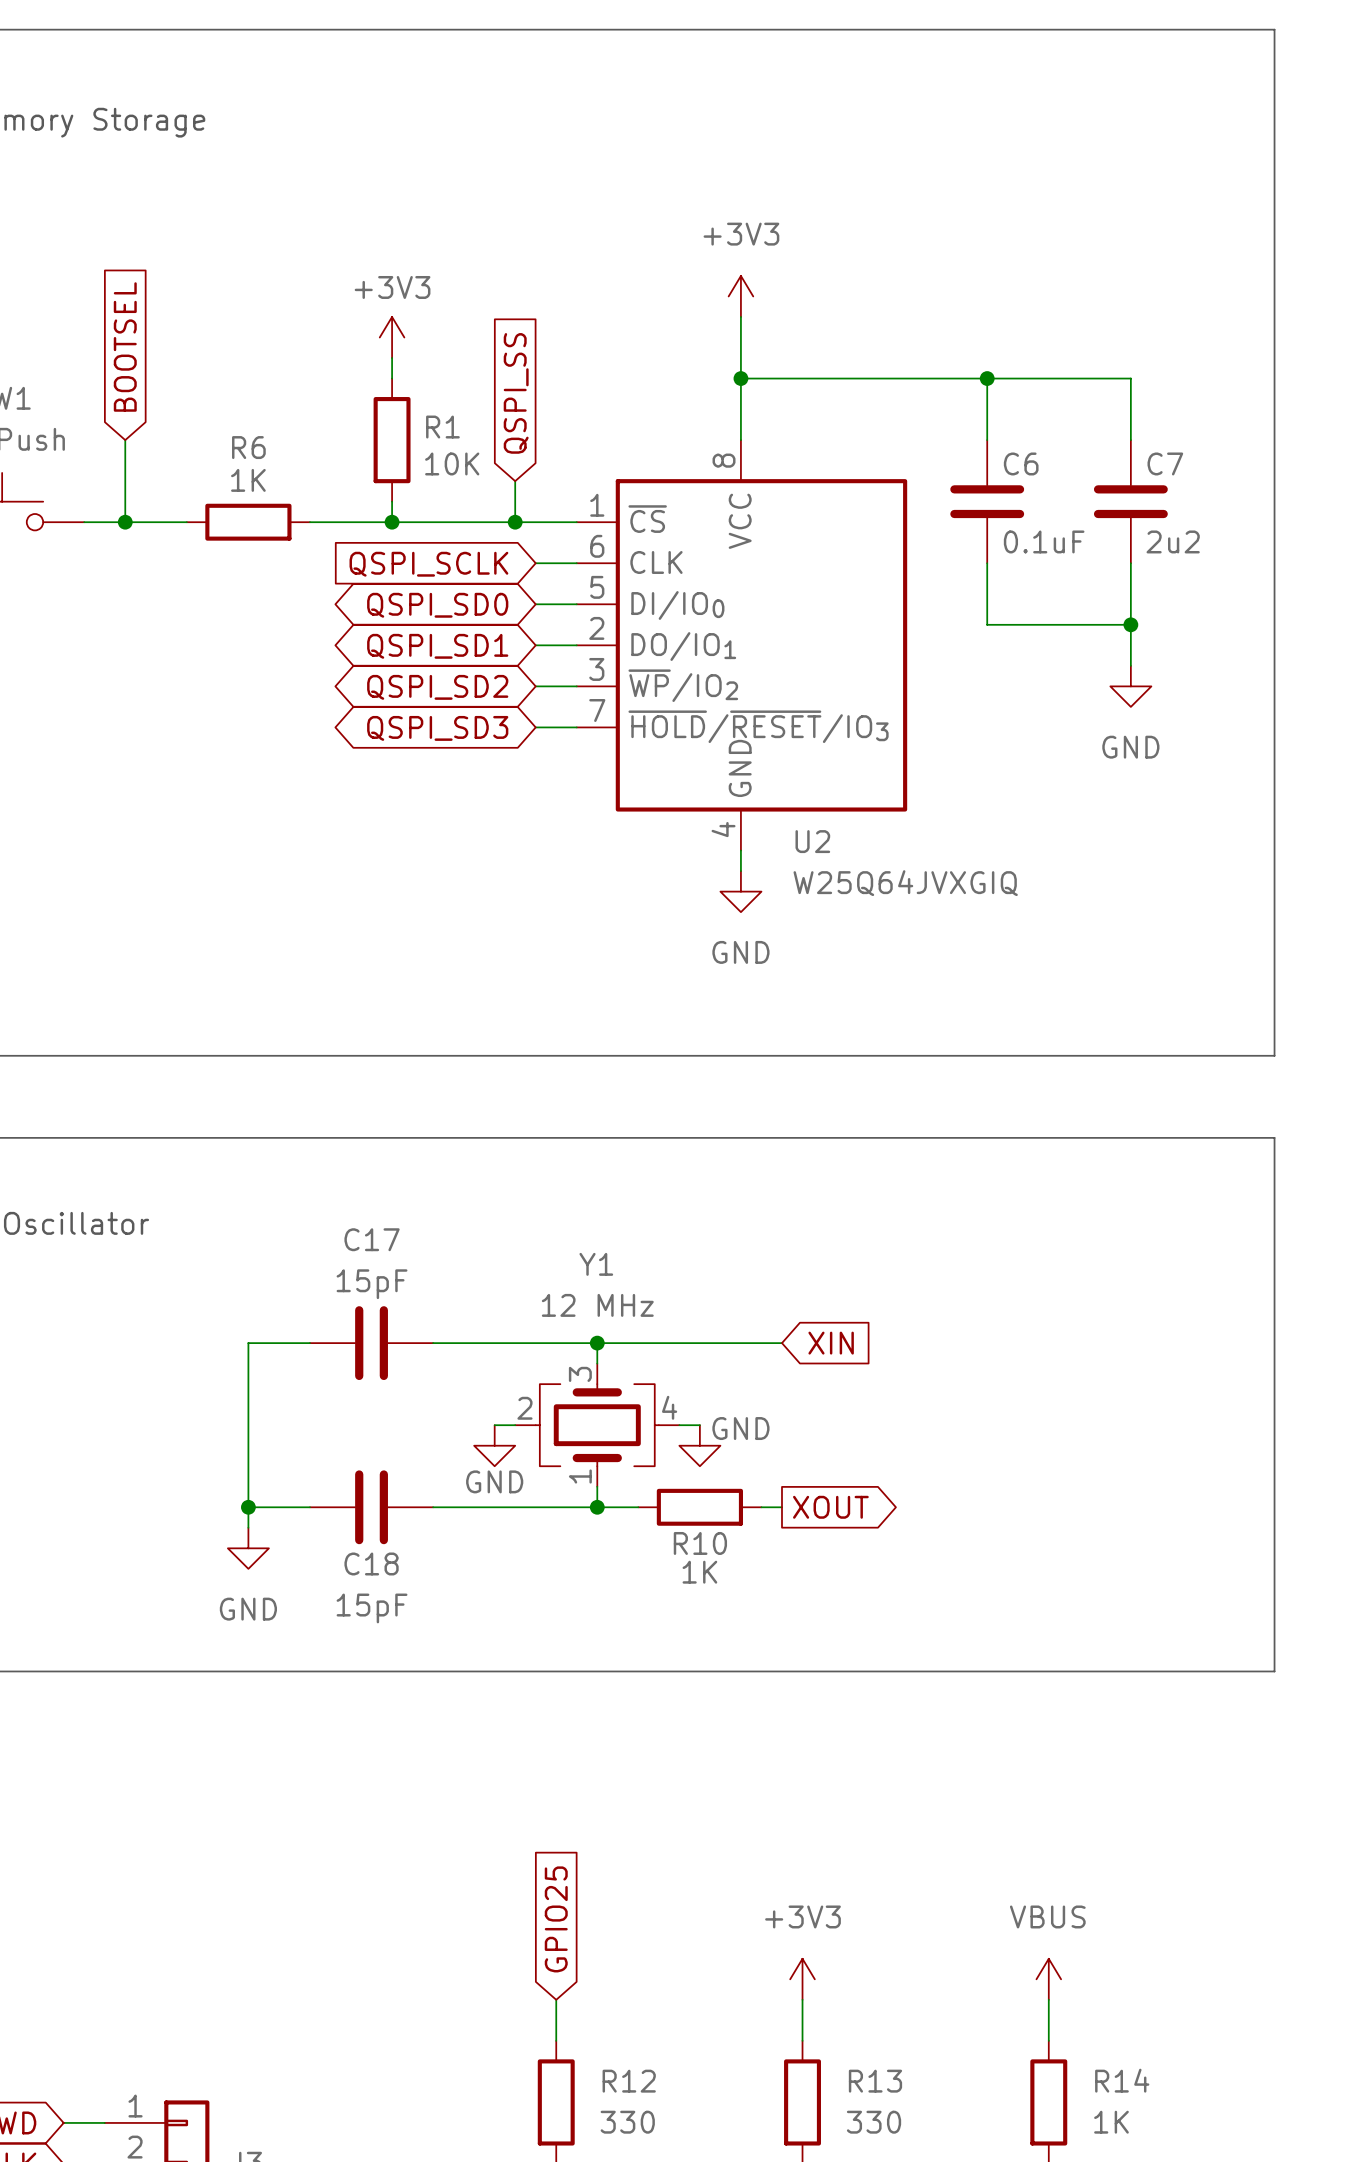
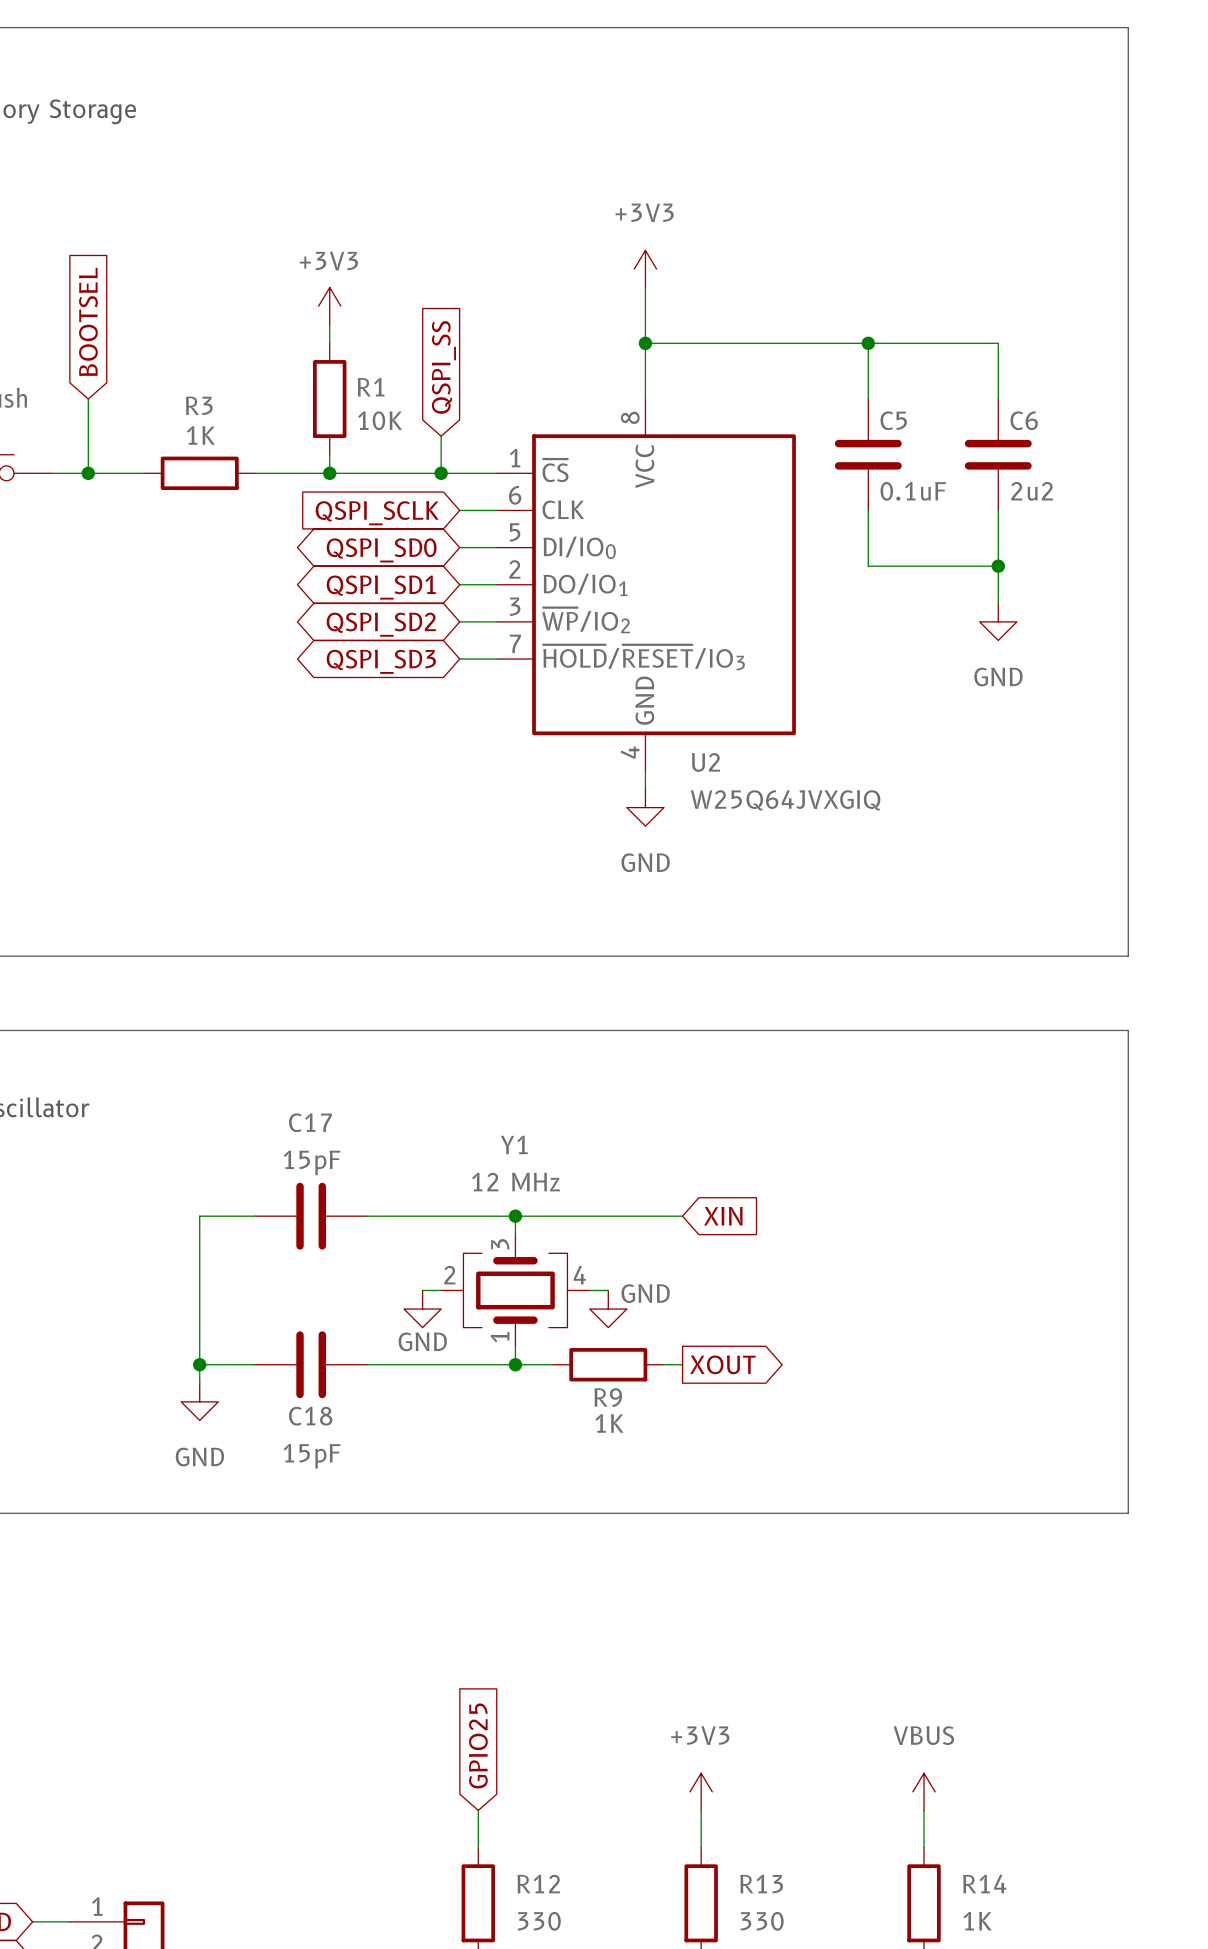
R6 name: R6 (248, 447) -> R3 (199, 405)
C6 name: C6 (1021, 463) -> C5 (893, 420)
C7 name: C7 (1165, 463) -> C6 (1024, 420)
R10 name: R10 (700, 1543) -> R9 (608, 1397)

